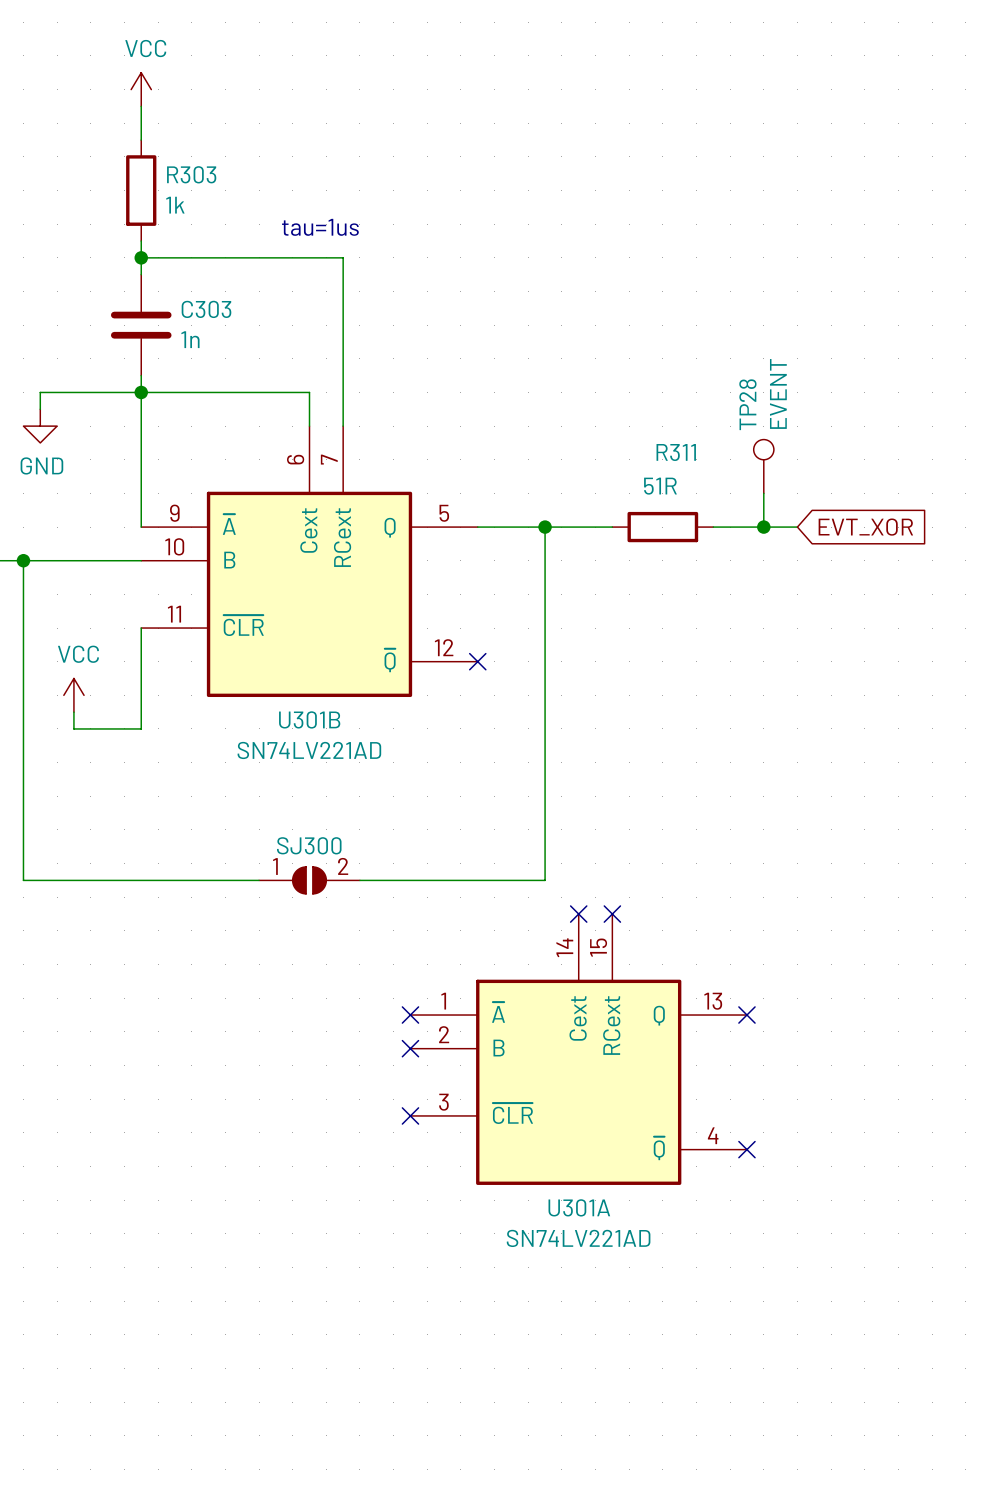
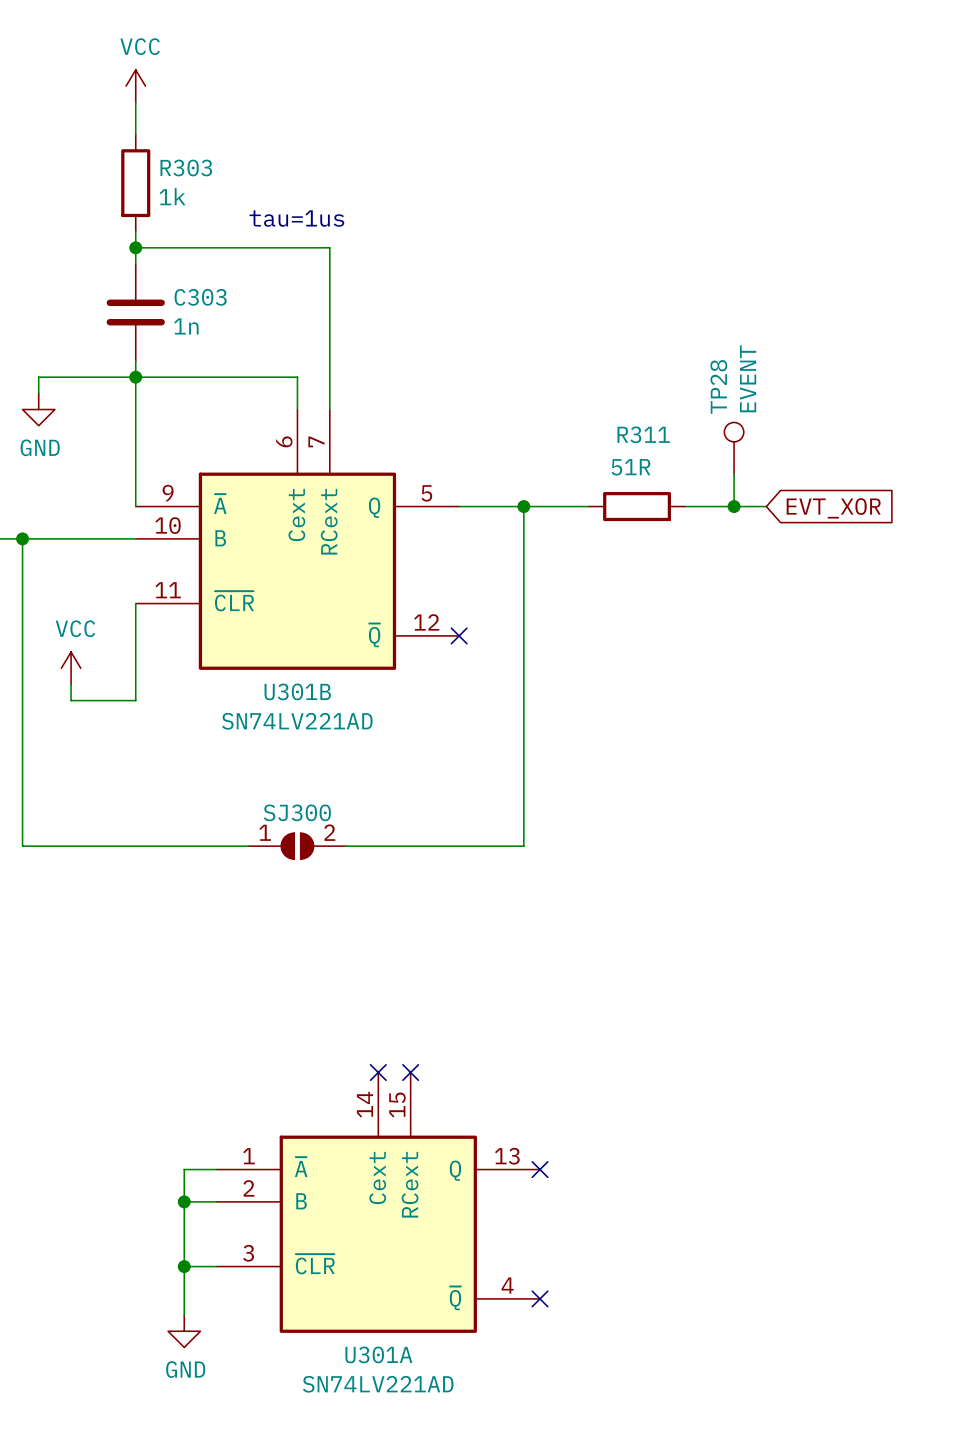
no-connect mark: (578, 914) -> none
no-connect mark: (612, 914) -> none
no-connect mark: (410, 1015) -> none
no-connect mark: (746, 1015) -> none
no-connect mark: (410, 1048) -> none
U301A position: (578, 1049) -> (378, 1202)
no-connect mark: none -> (378, 1072)
no-connect mark: (410, 1115) -> none
no-connect mark: none -> (410, 1072)
no-connect mark: (746, 1149) -> none
wire: none -> (216, 1169) (184, 1169) (184, 1315)
no-connect mark: none -> (540, 1169)
wire: none -> (184, 1201) (216, 1201)
junction: none -> (184, 1201)
wire: none -> (184, 1266) (216, 1266)
junction: none -> (184, 1266)
no-connect mark: none -> (540, 1298)
power symbol: none -> GND (184, 1331)

